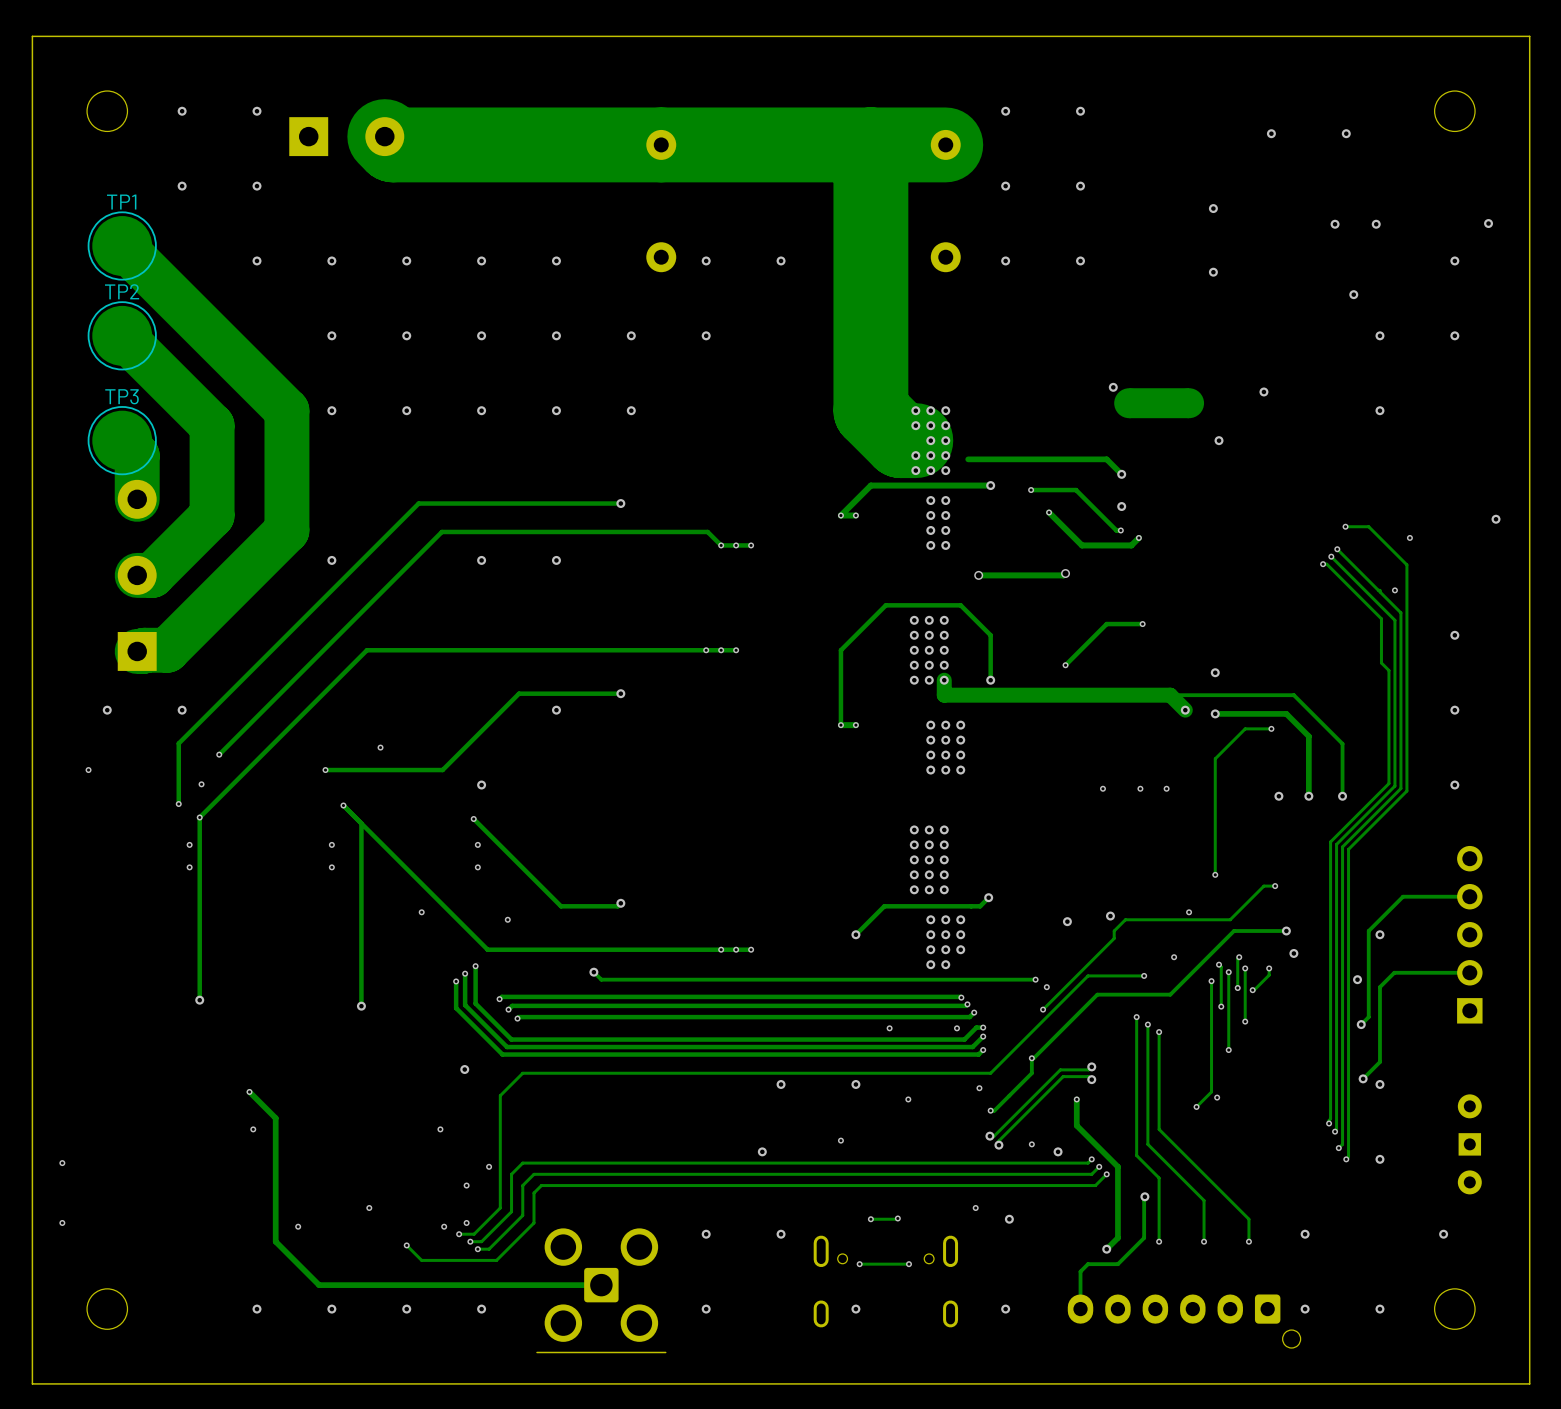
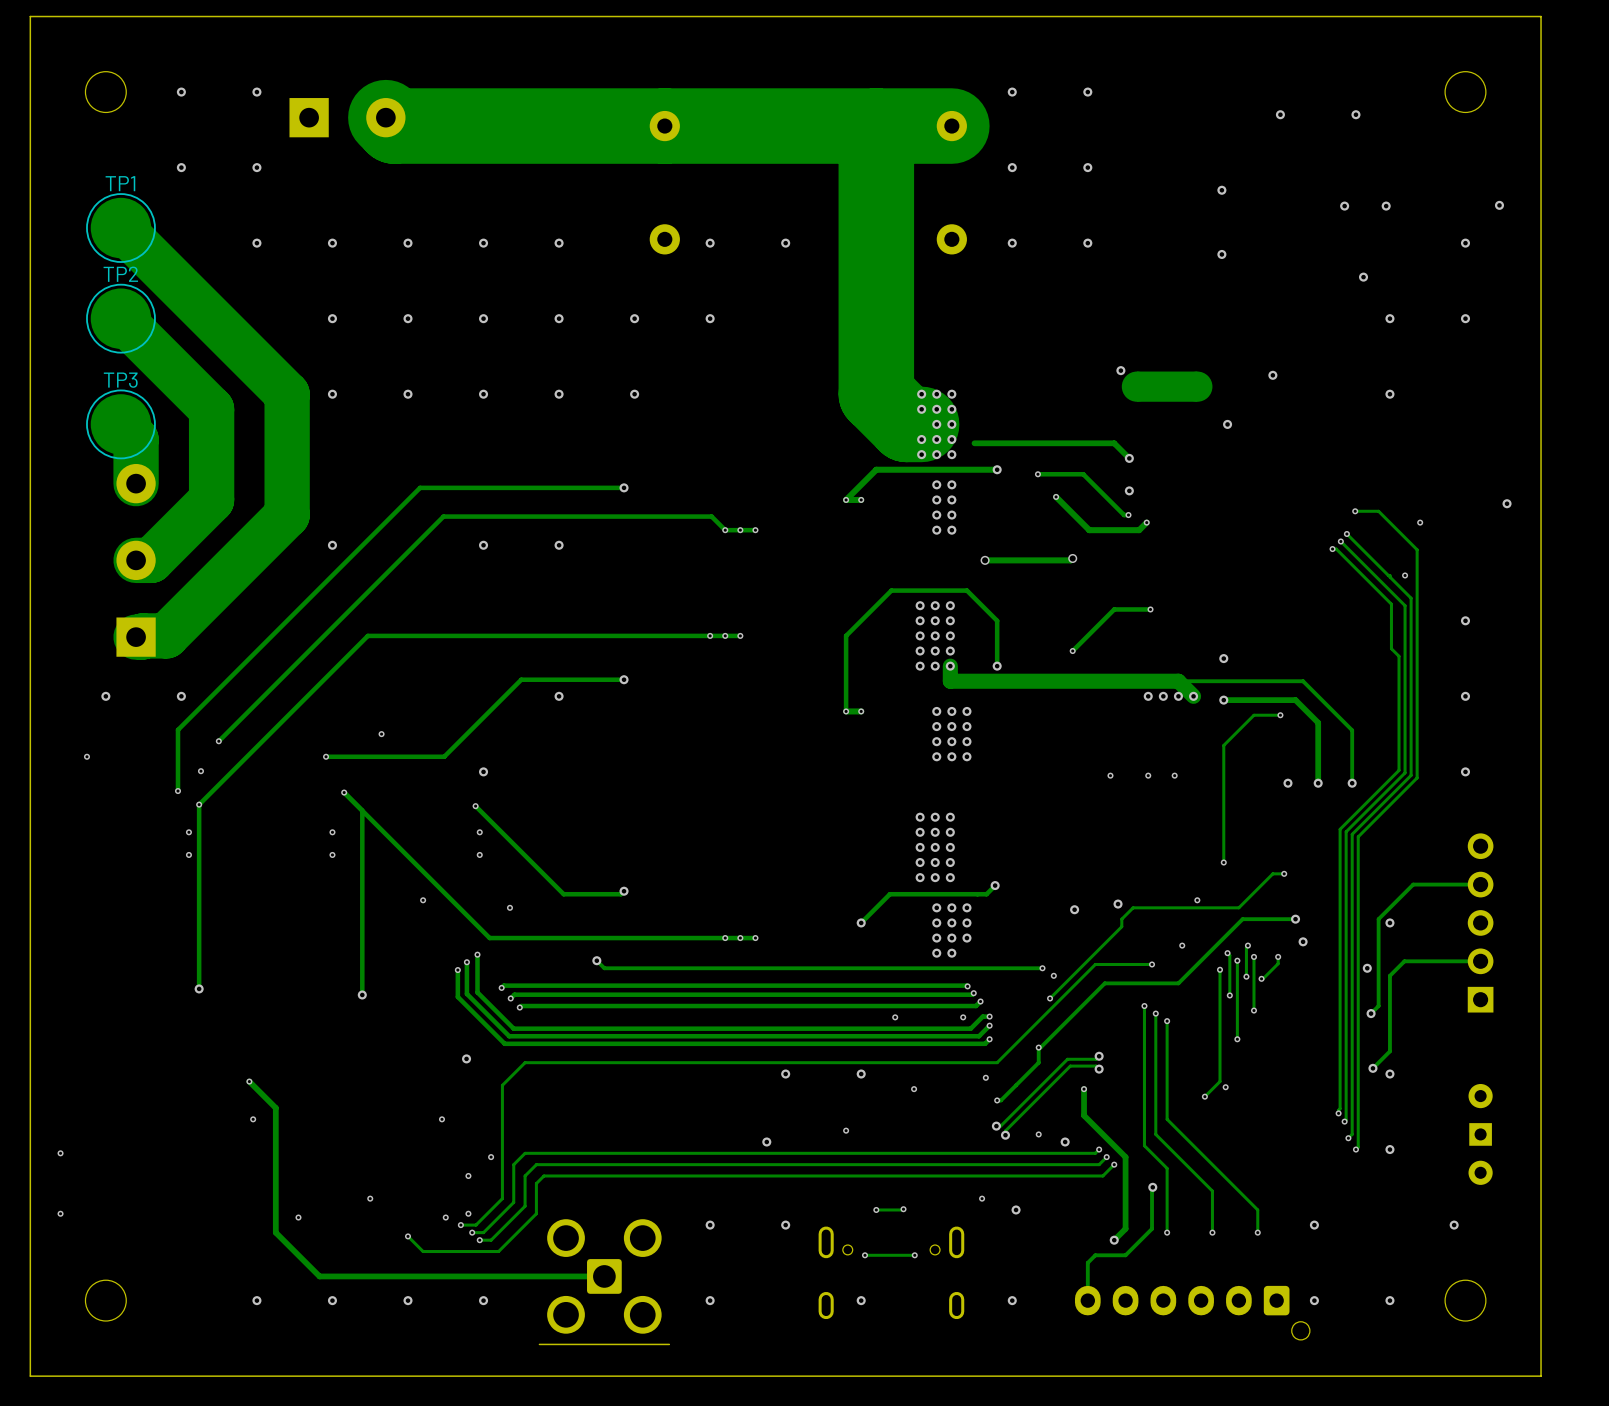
via: none -> (1148, 696)
via: none -> (1163, 696)
via: none -> (1178, 696)

